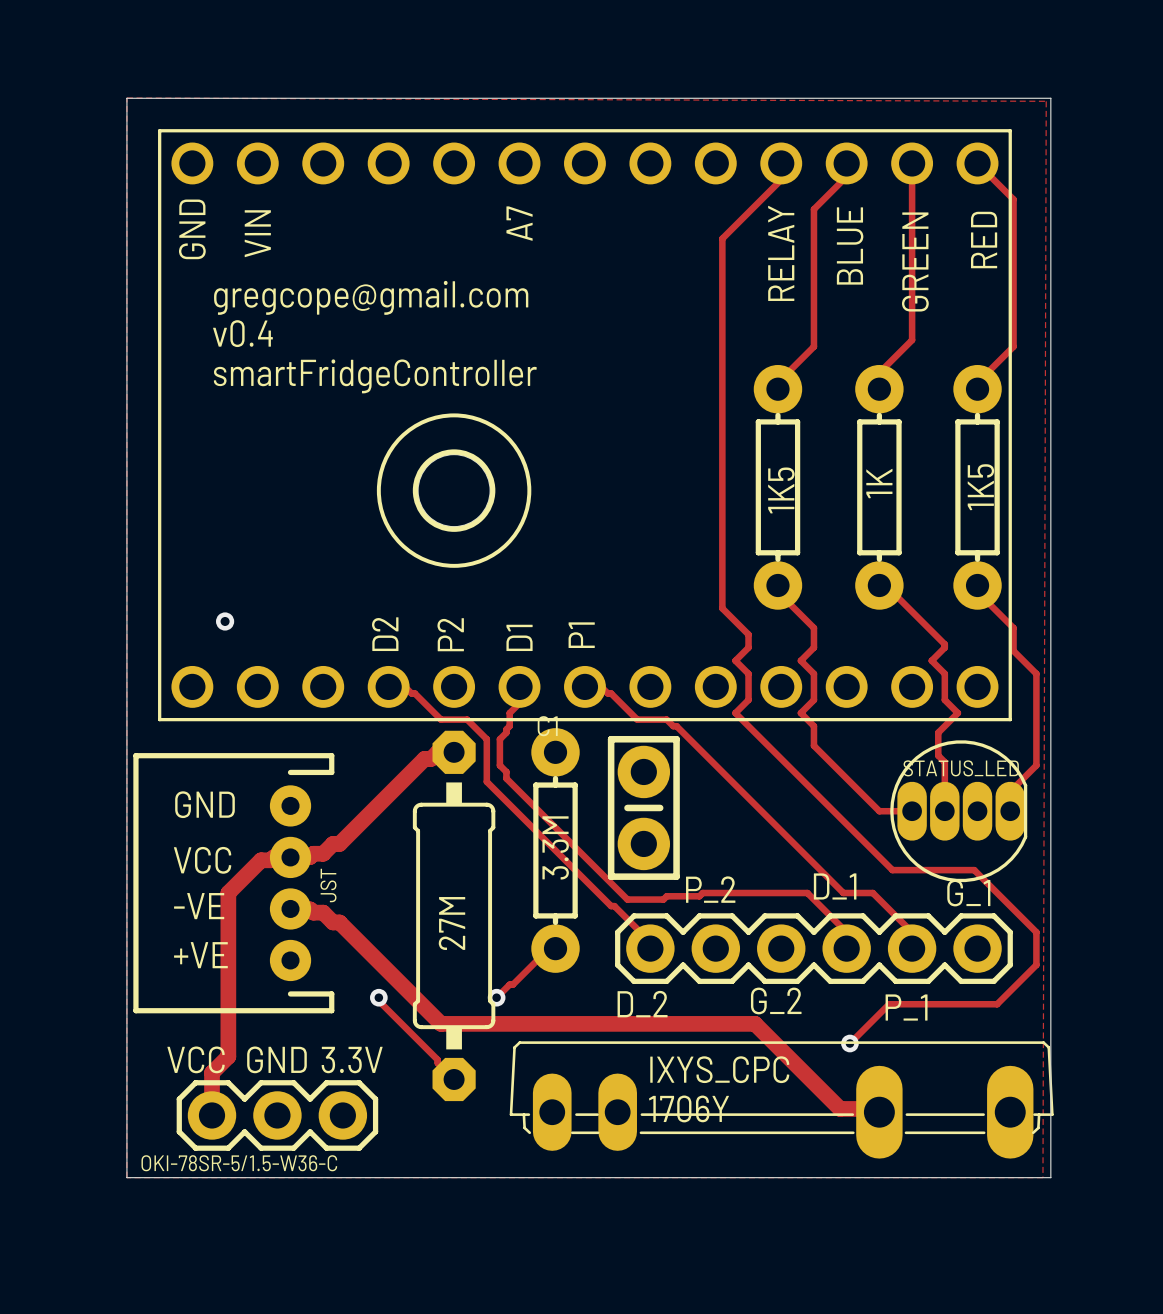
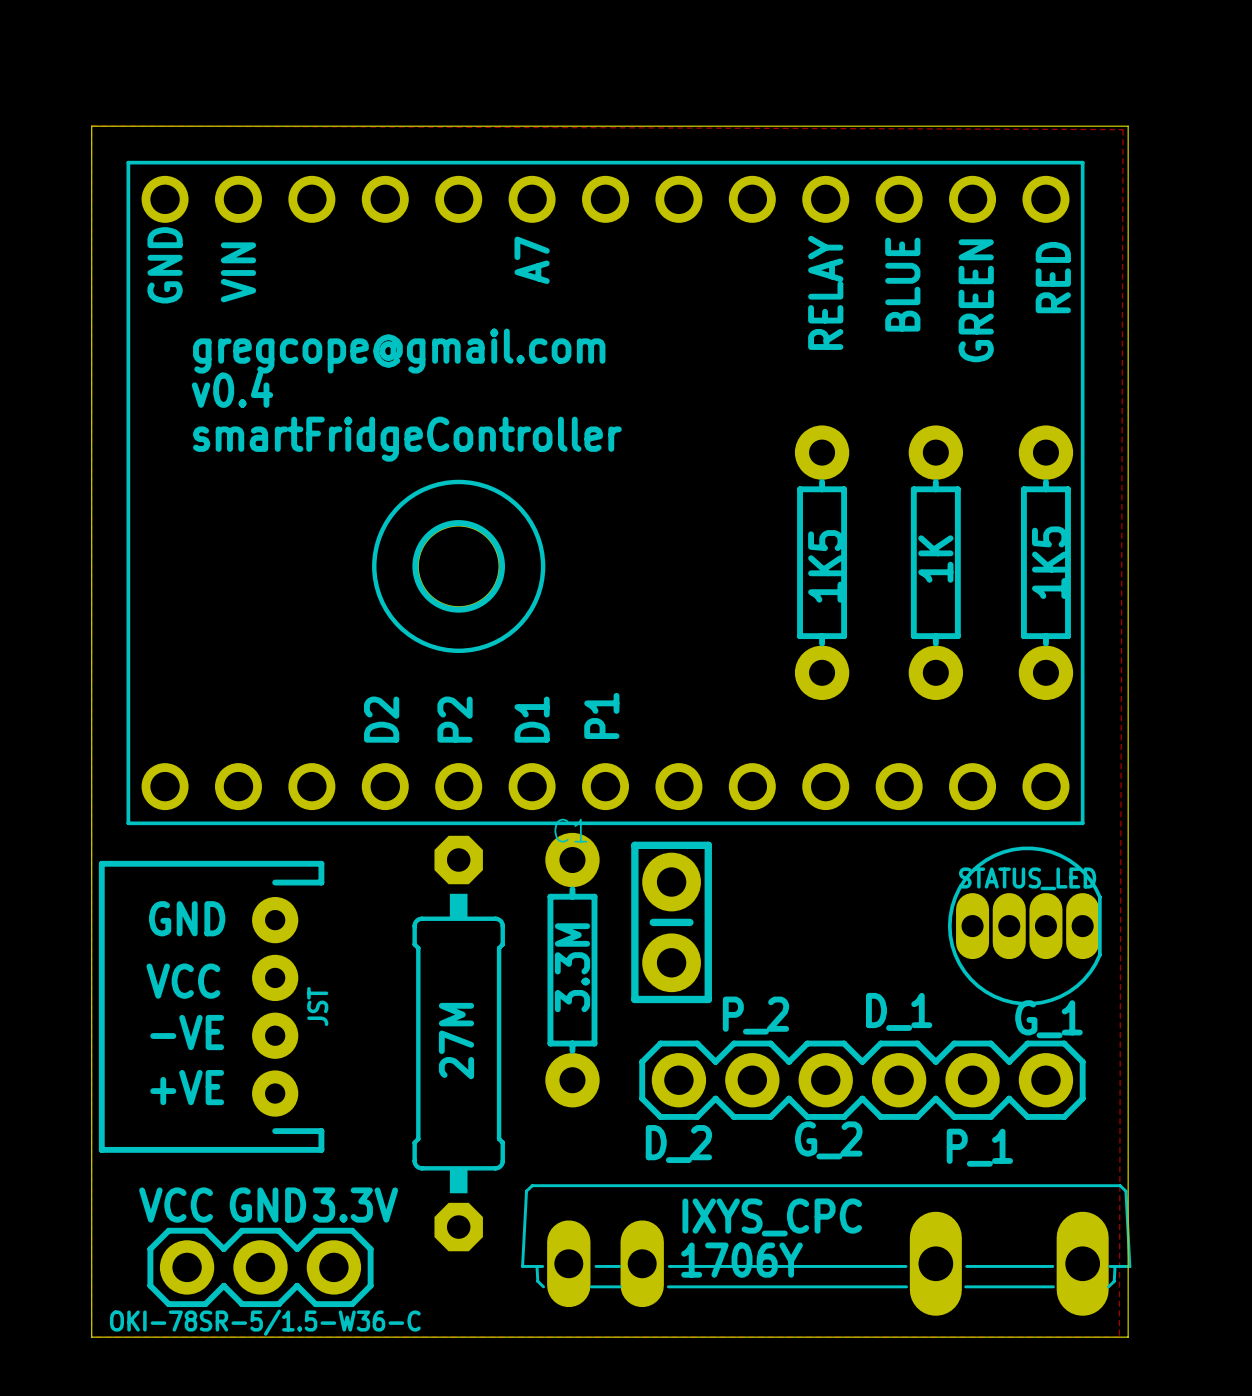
track: (781, 163) (781, 179) (722, 238) (722, 608) (748, 634) (748, 647) (735, 660) (748, 673) (748, 699) (735, 713) (892, 870) (974, 870) (1036, 932) (1036, 964) (997, 1004) (889, 1004) (849, 1043) -> none
track: (846, 163) (846, 176) (813, 209) (813, 346) (777, 382) (777, 389) -> none
track: (912, 163) (912, 340) (879, 372) (879, 389) -> none
track: (977, 163) (1013, 199) (1013, 346) (977, 382) (977, 389) -> none
track: (777, 585) (777, 592) (813, 628) (813, 647) (800, 660) (813, 673) (813, 699) (800, 713) (813, 726) (813, 745) (879, 811) (912, 811) -> none
track: (879, 585) (885, 585) (944, 644) (944, 647) (931, 660) (944, 673) (944, 699) (957, 713) (938, 732) (938, 755) (944, 762) (944, 811) -> none
track: (977, 585) (977, 592) (1013, 628) (1013, 650) (1036, 673) (1036, 765) (1010, 791) (1010, 811) -> none
via: (225, 621) -> none
track: (388, 686) (405, 686) (411, 693) (414, 693) (441, 719) (467, 719) (486, 739) (486, 781) (611, 906) (614, 906) (650, 942) (650, 948) -> none
track: (519, 686) (519, 703) (509, 713) (509, 726) (499, 739) (499, 765) (506, 771) (506, 778) (627, 899) (663, 899) (666, 896) (699, 896) (702, 893) (807, 893) (846, 932) (846, 948) -> none
track: (584, 686) (601, 686) (607, 693) (611, 693) (637, 719) (666, 719) (673, 726) (676, 726) (843, 893) (872, 893) (912, 932) (912, 948) -> none
track: (454, 752) (437, 752) (431, 758) (424, 758) (339, 843) (333, 843) (323, 853) (313, 853) (310, 857) (290, 857) -> none
track: (290, 857) (274, 857) (270, 860) (261, 860) (228, 893) (228, 1056) (212, 1072) (212, 1115) -> none
track: (290, 909) (310, 909) (313, 912) (323, 912) (333, 922) (339, 922) (441, 1023) (755, 1023) (840, 1108) (876, 1108) (879, 1112) -> none
track: (555, 948) (548, 948) (512, 984) (509, 984) (496, 997) -> none
track: (378, 997) (378, 1000) (437, 1059) (437, 1063) (454, 1079) -> none
via: (378, 997) -> none
via: (496, 997) -> none
via: (849, 1043) -> none

